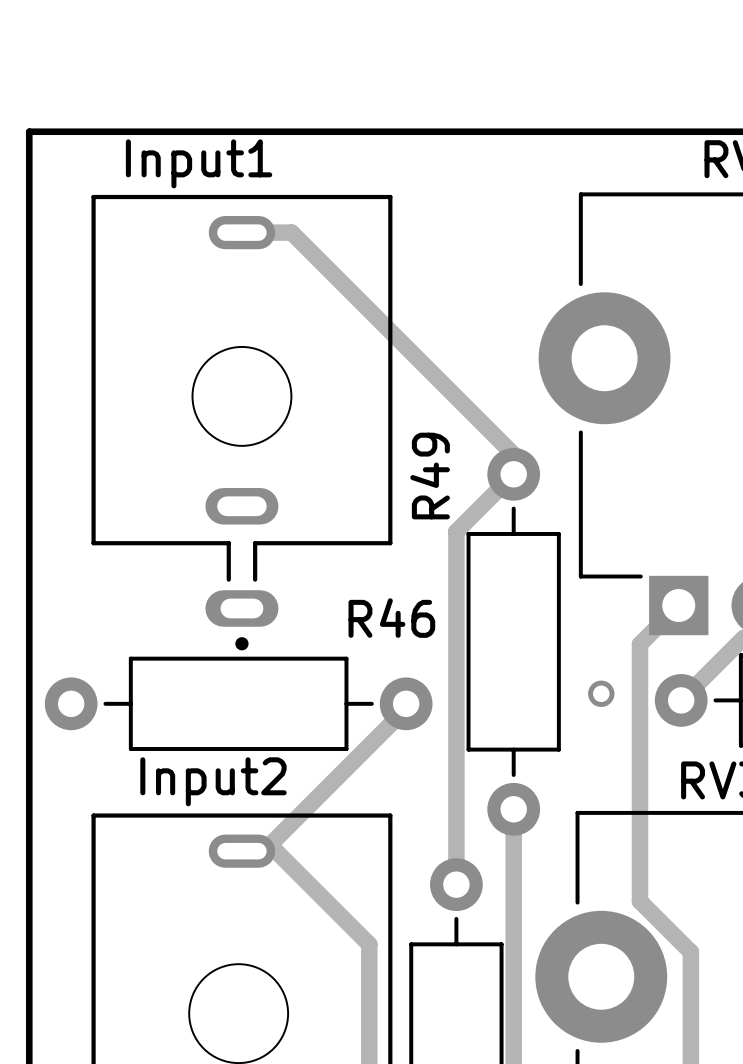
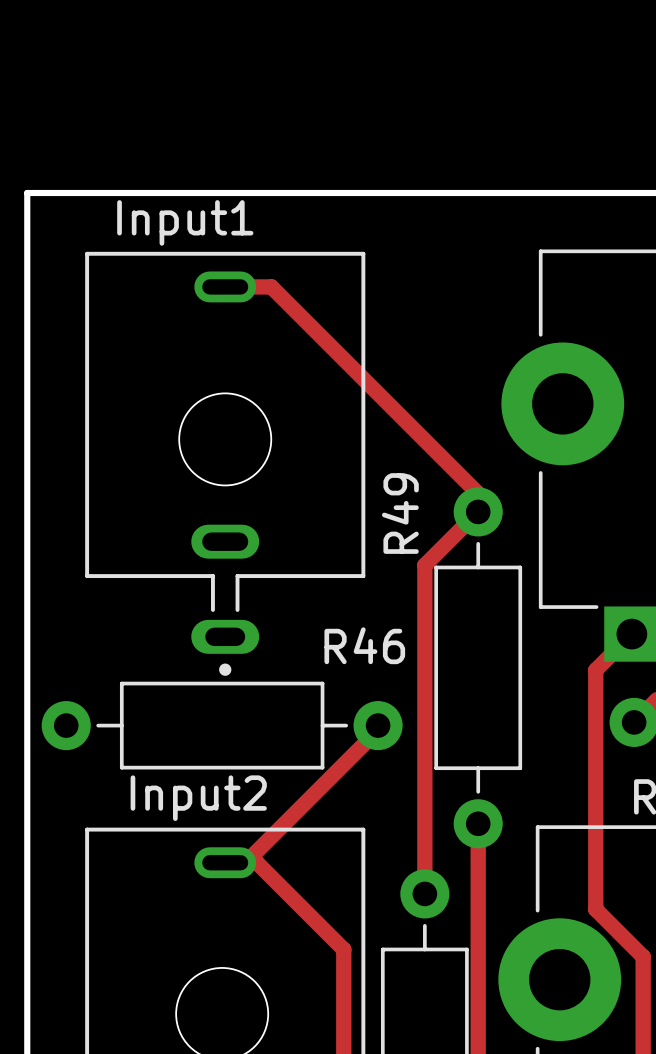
via: (601, 693) -> none

